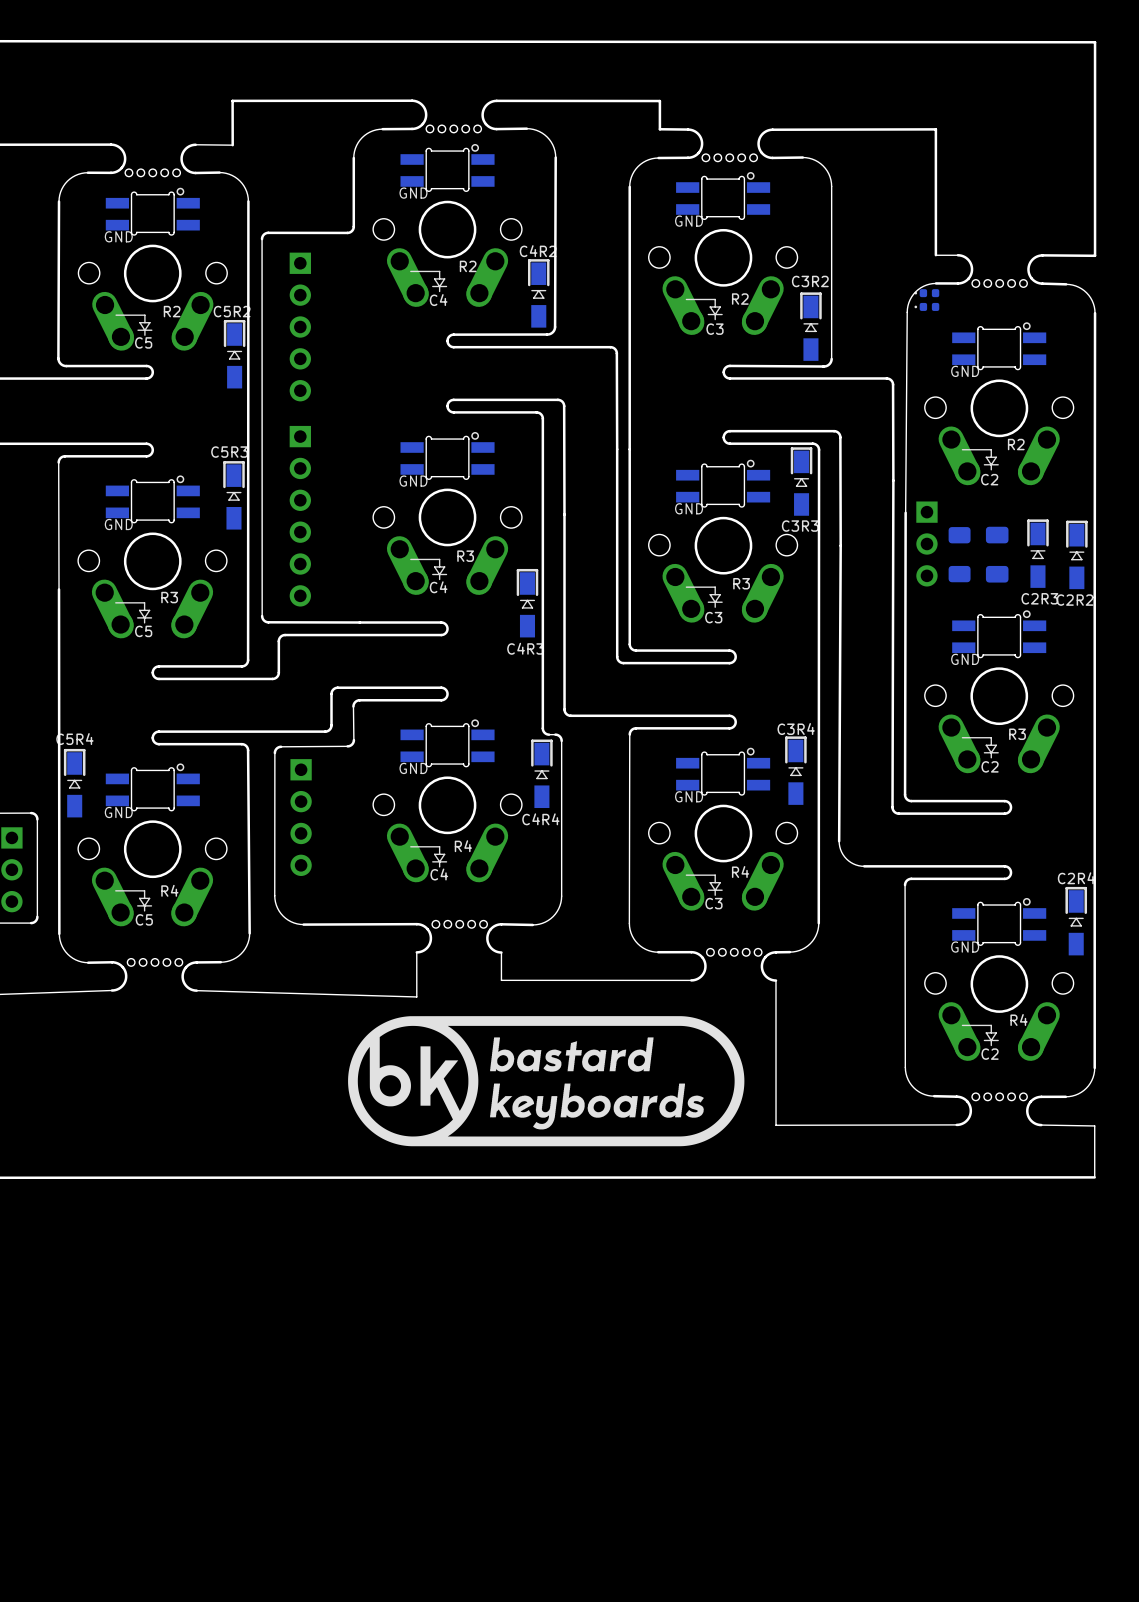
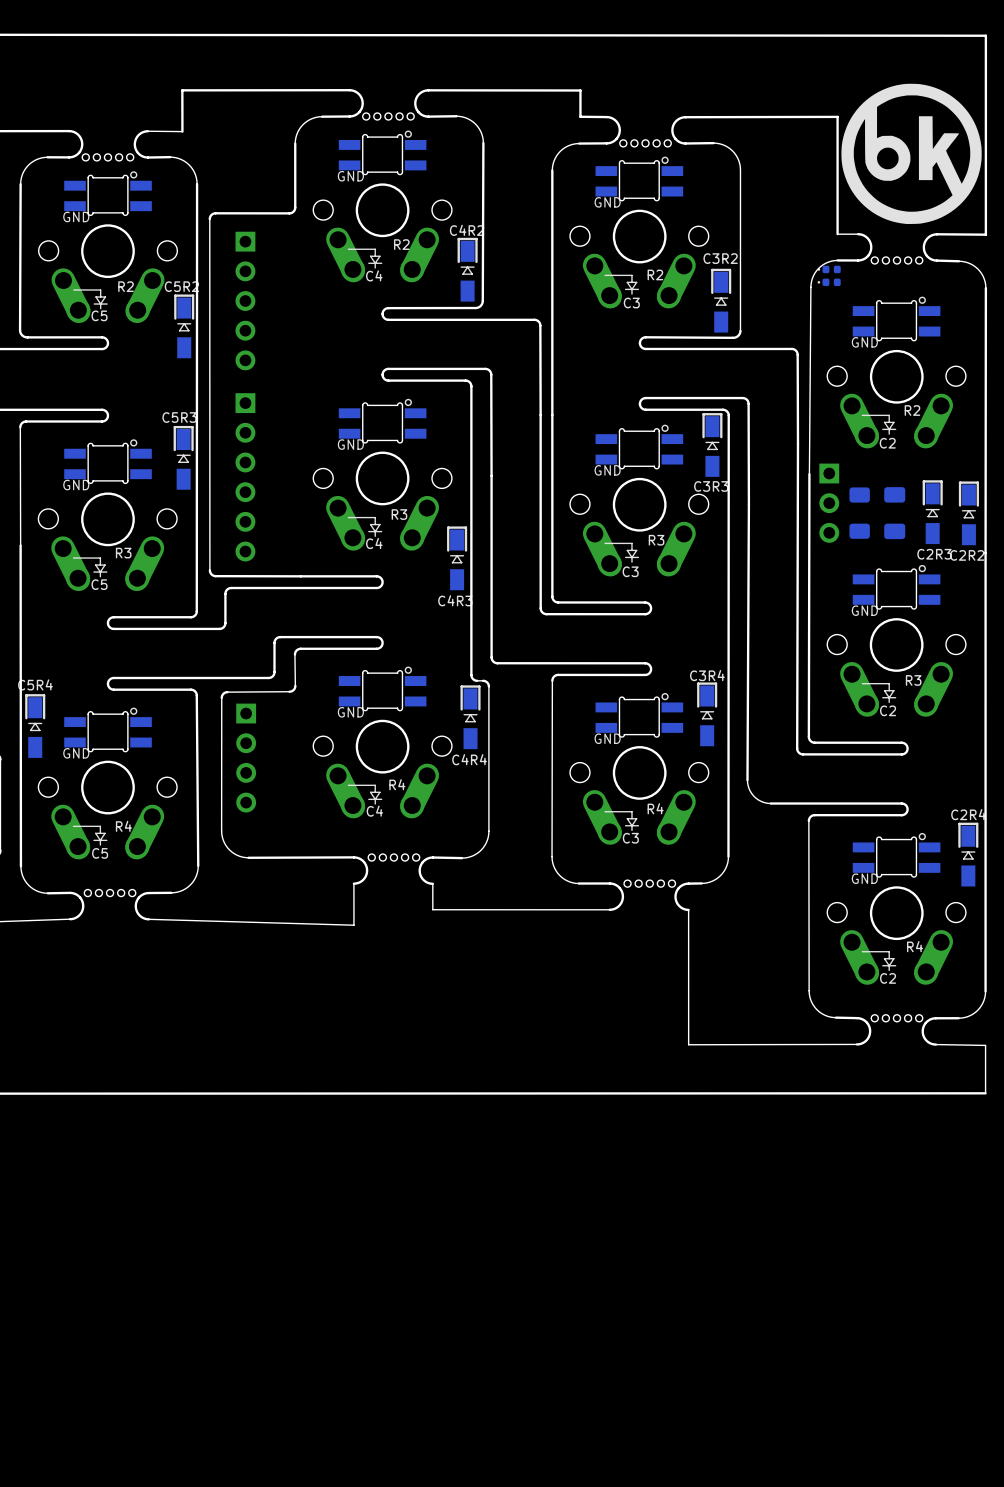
drawing: none -> [841, 83, 982, 224]
drawing: [348, 1016, 745, 1147] -> none

